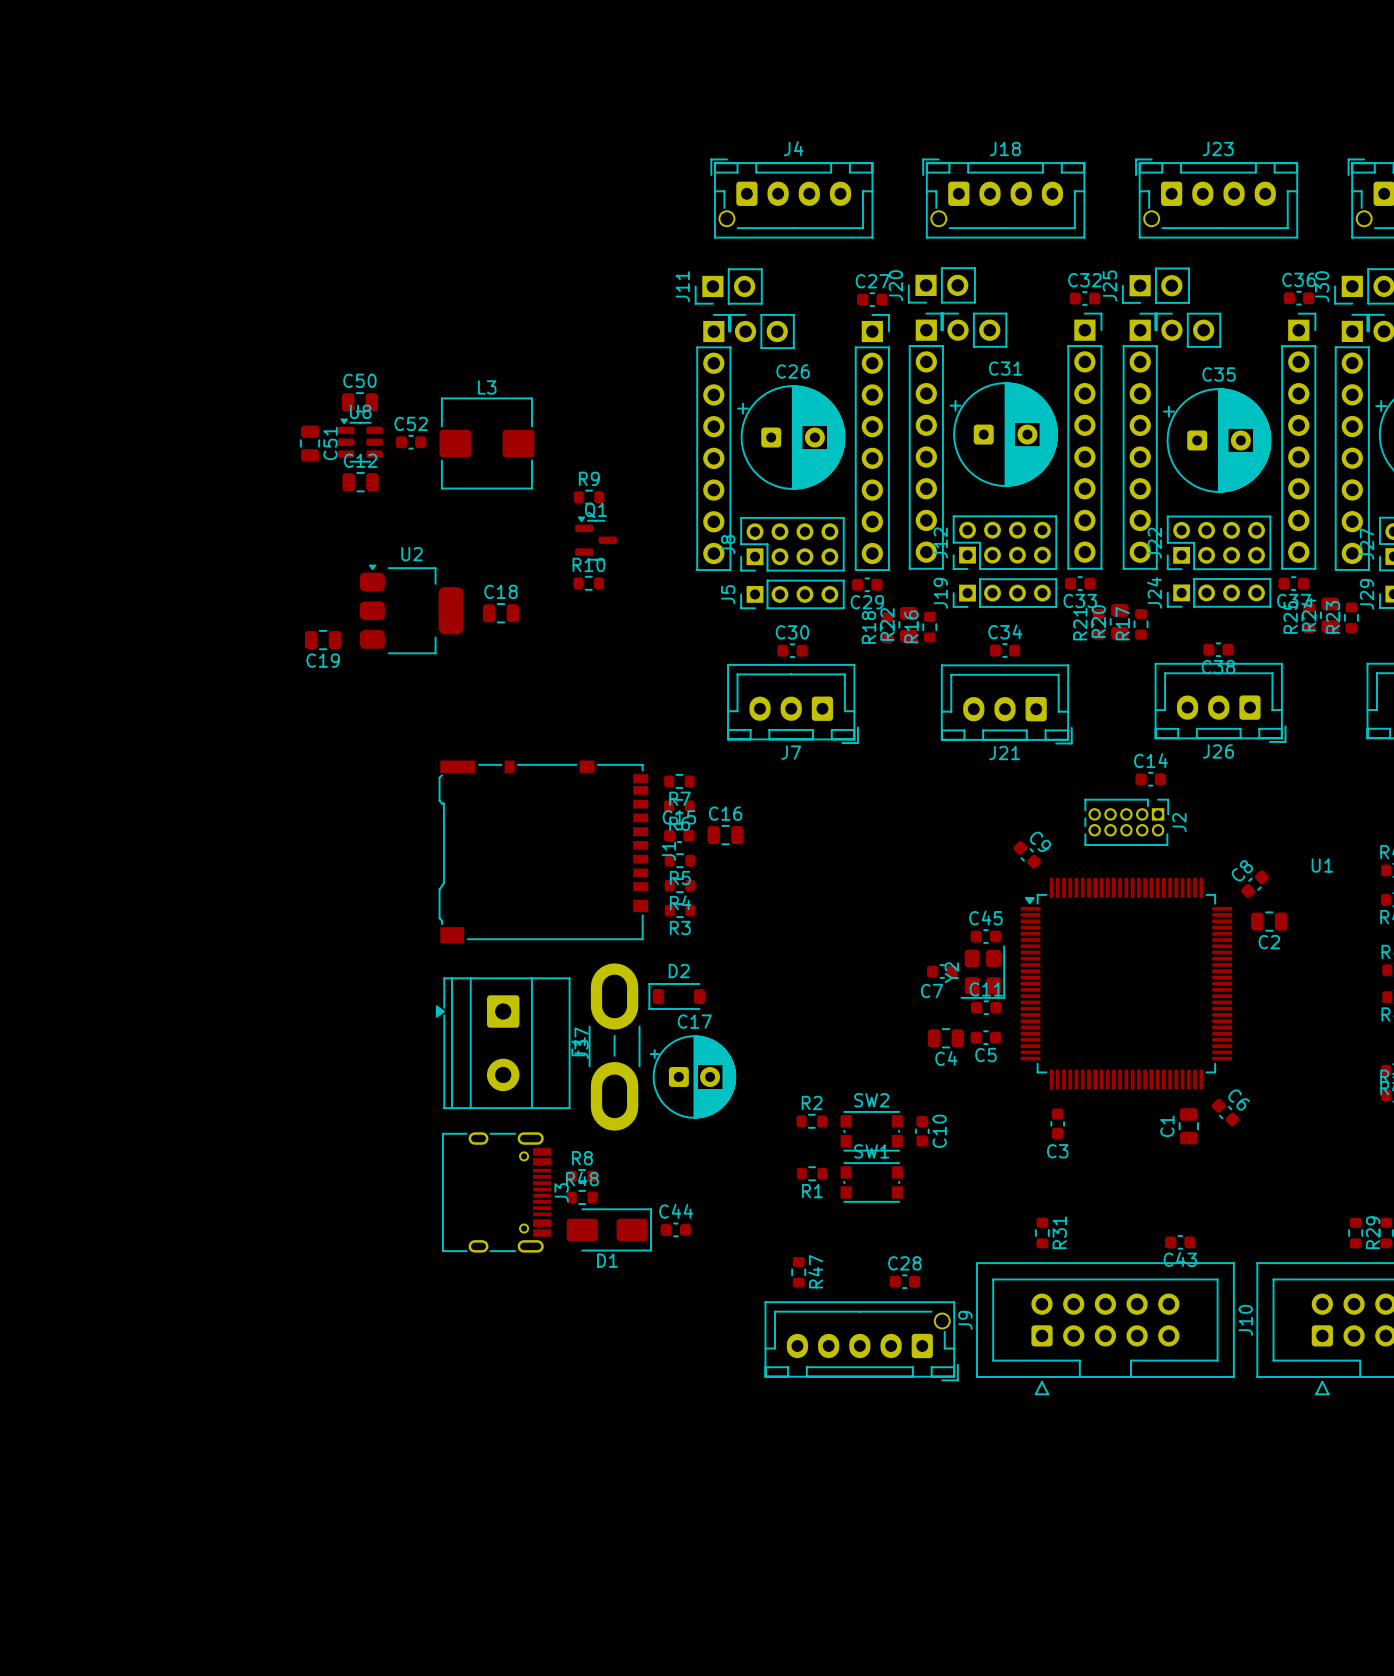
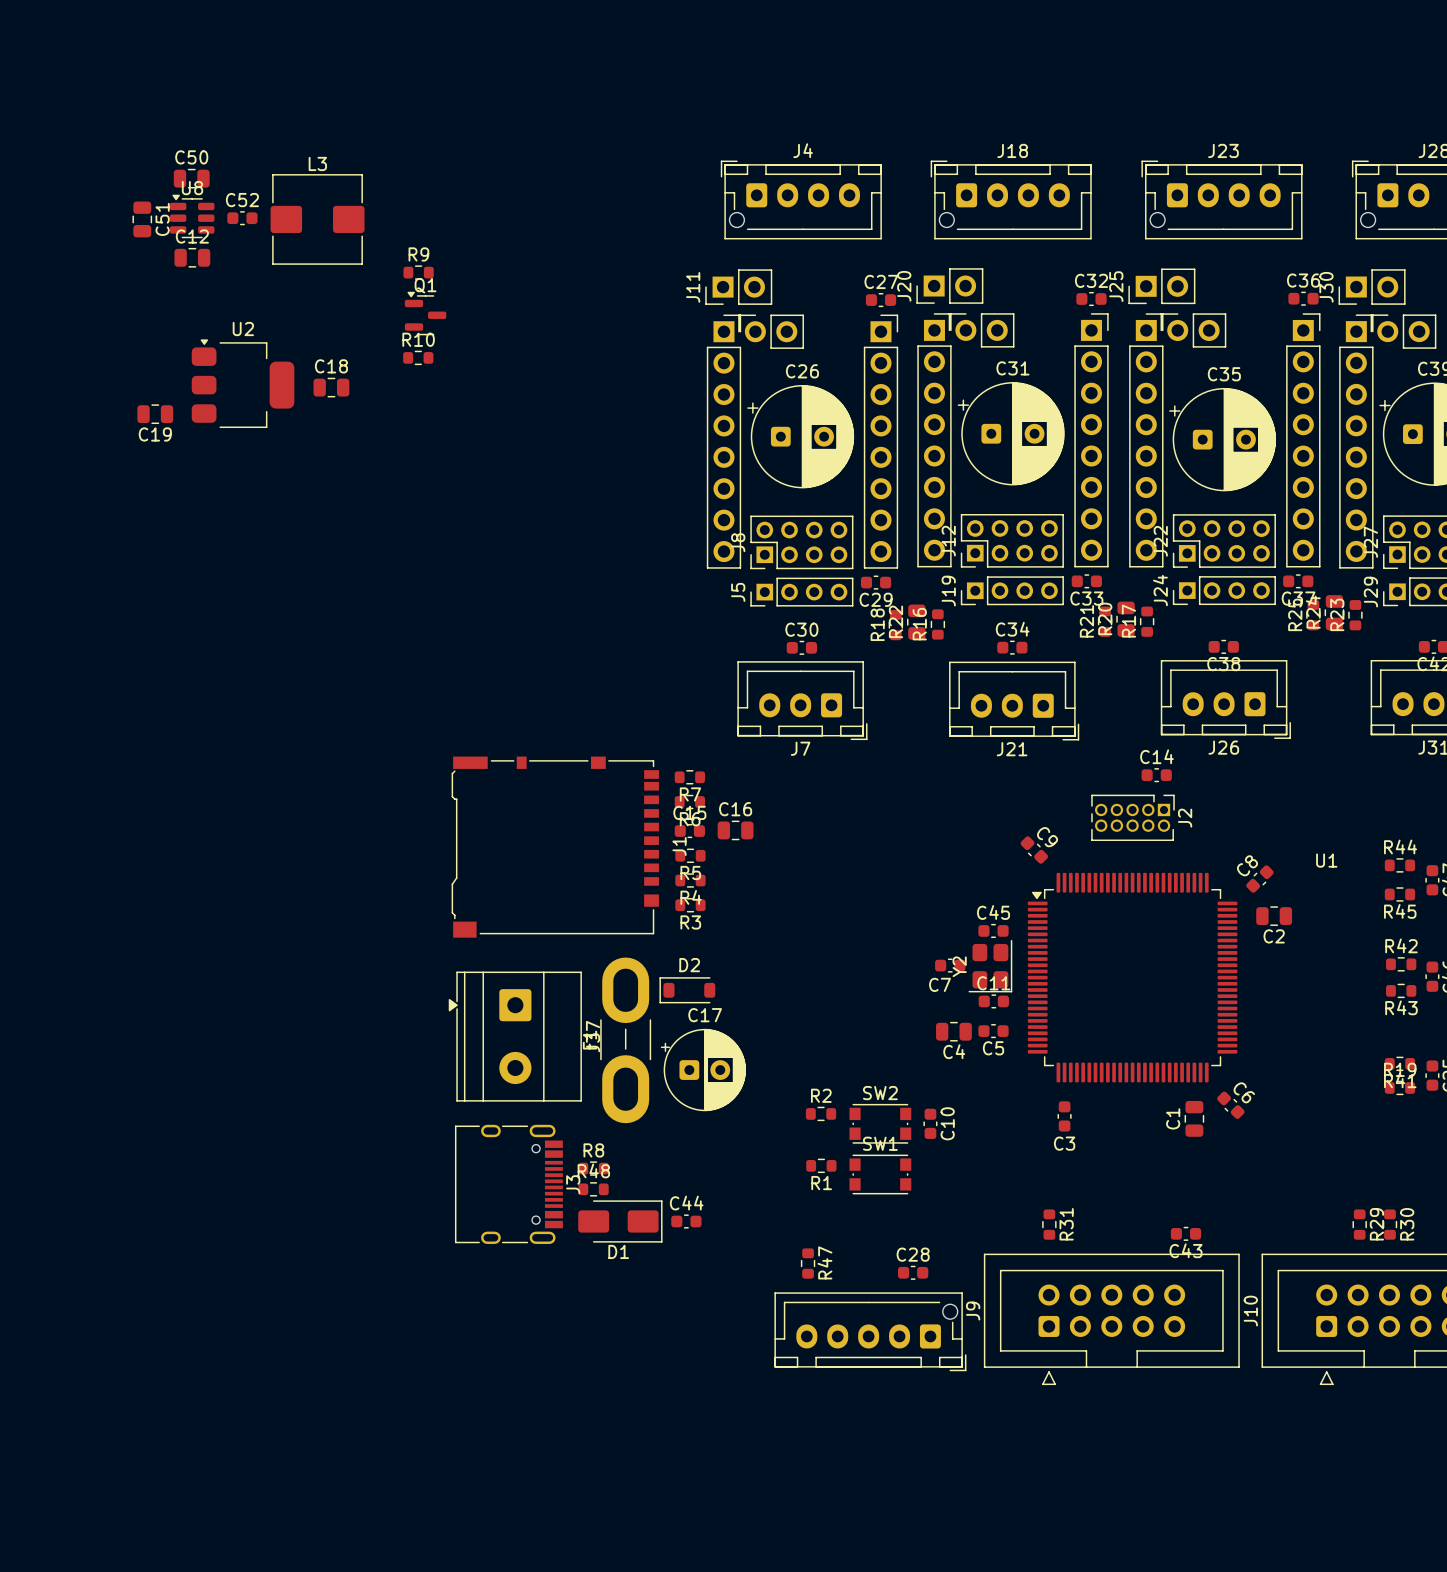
C50 position: (359, 402) -> (191, 178)
U8 position: (360, 440) -> (192, 216)
C52 position: (411, 442) -> (242, 218)
C51 position: (309, 443) -> (142, 219)
L3 position: (486, 443) -> (317, 219)
C12 position: (360, 482) -> (192, 257)
R9 position: (588, 497) -> (418, 272)
Q1 position: (596, 538) -> (425, 313)
R10 position: (588, 583) -> (418, 357)
U2 position: (411, 609) -> (243, 383)
C18 position: (500, 613) -> (331, 387)
C19 position: (323, 640) -> (155, 414)

